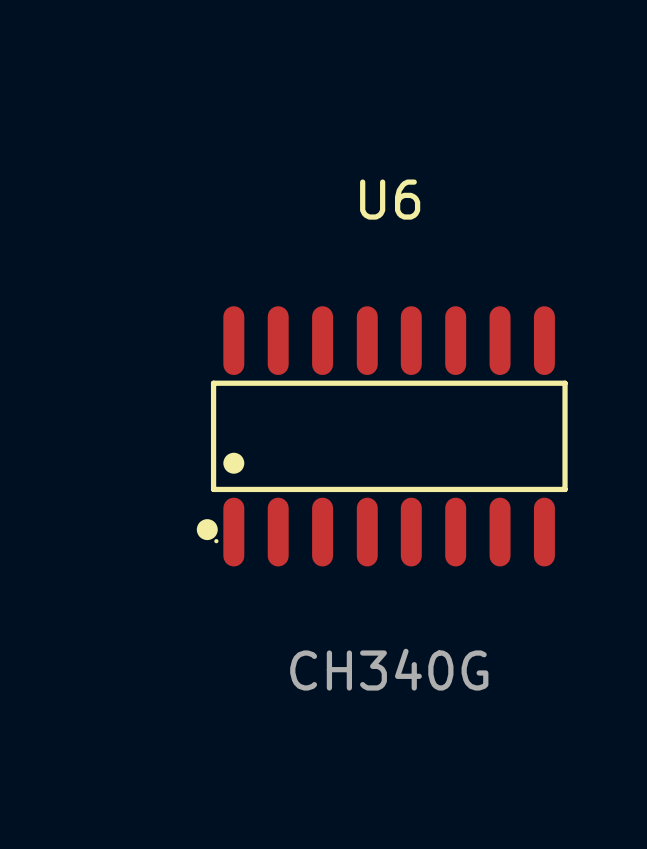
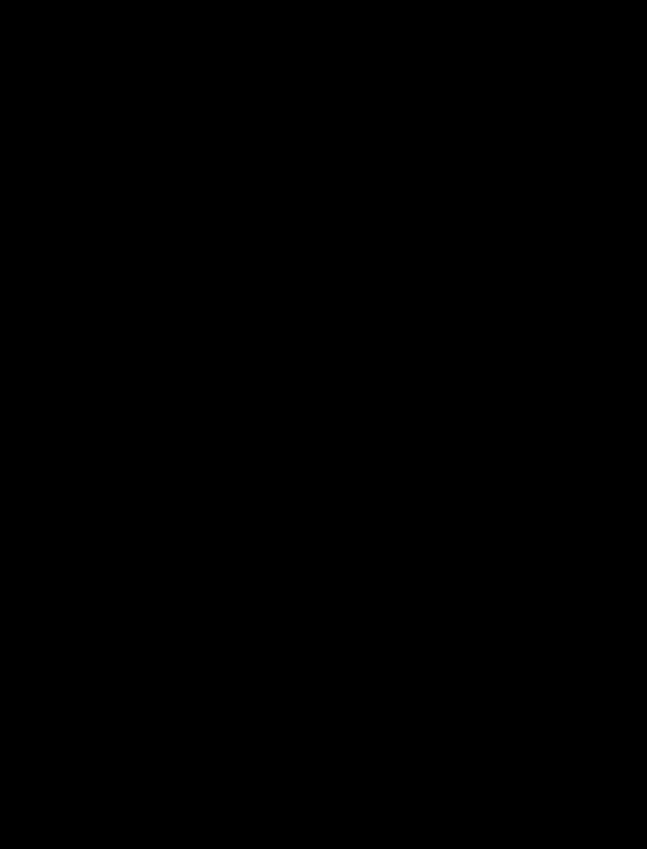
U6: CH340G (382, 436) -> none

